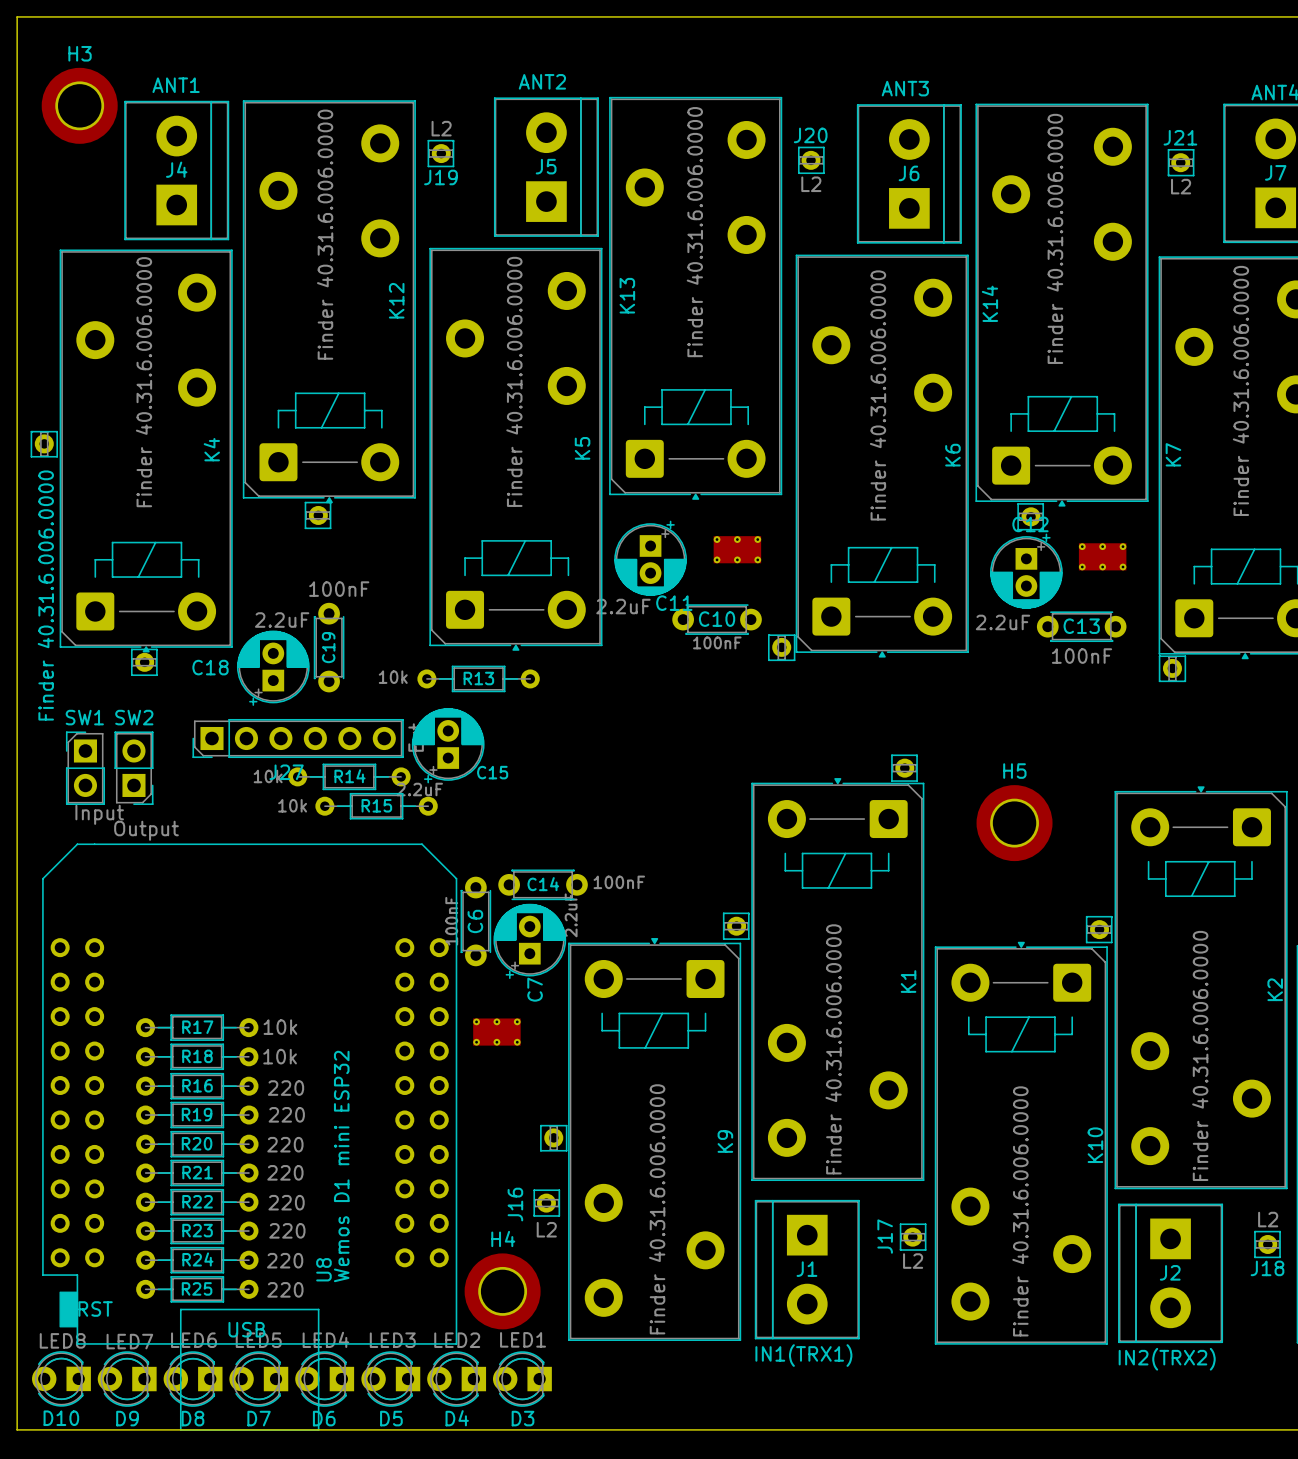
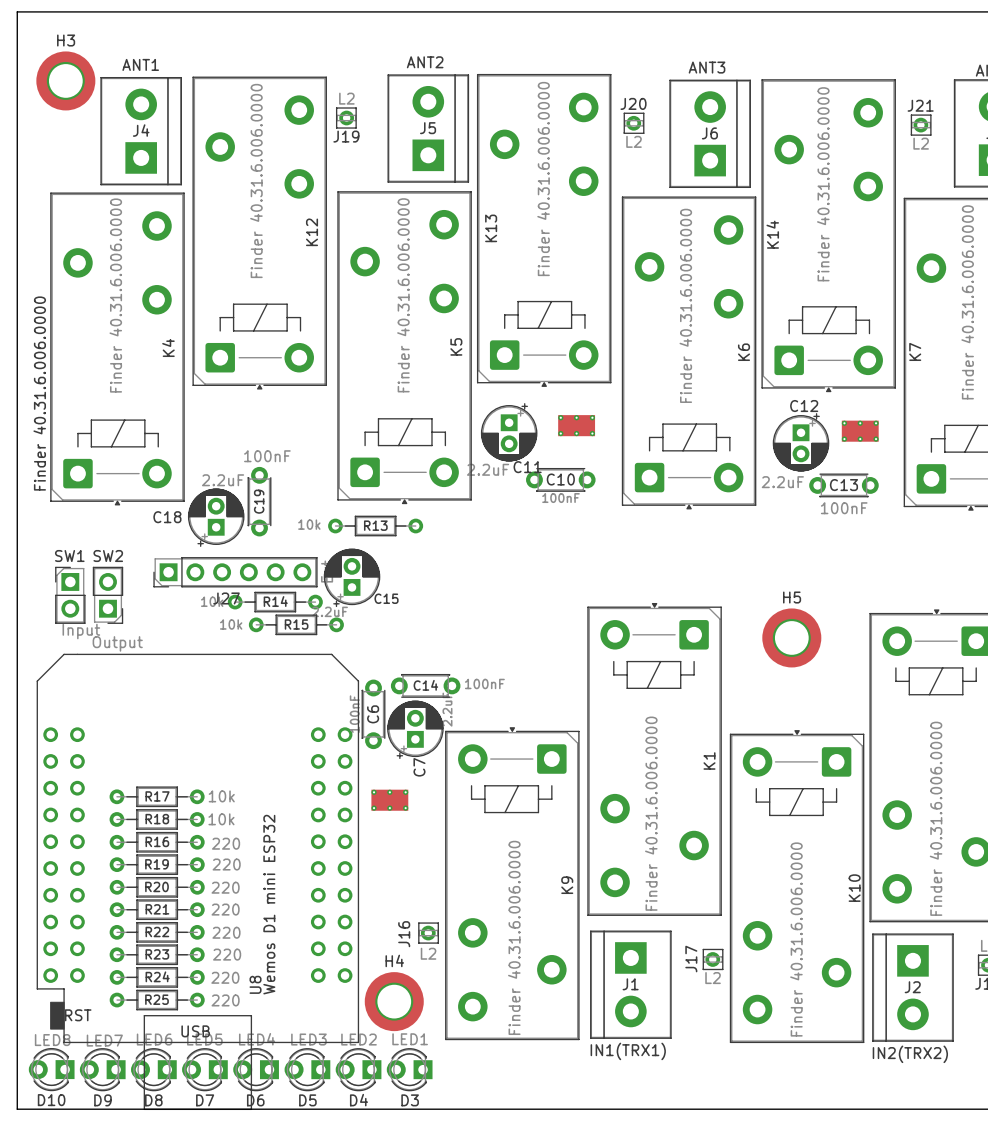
part: (44, 444) -> none
part: (318, 515) -> none
part: (1030, 516) -> none
text position: Finder 40.31.6.006.0000 (45, 595) -> Finder 40.31.6.006.0000 (39, 393)
part: (781, 647) -> none
part: (144, 662) -> none
part: (1172, 668) -> none
part: (904, 768) -> none
part: (736, 926) -> none
part: (1099, 929) -> none
part: (553, 1138) -> none

